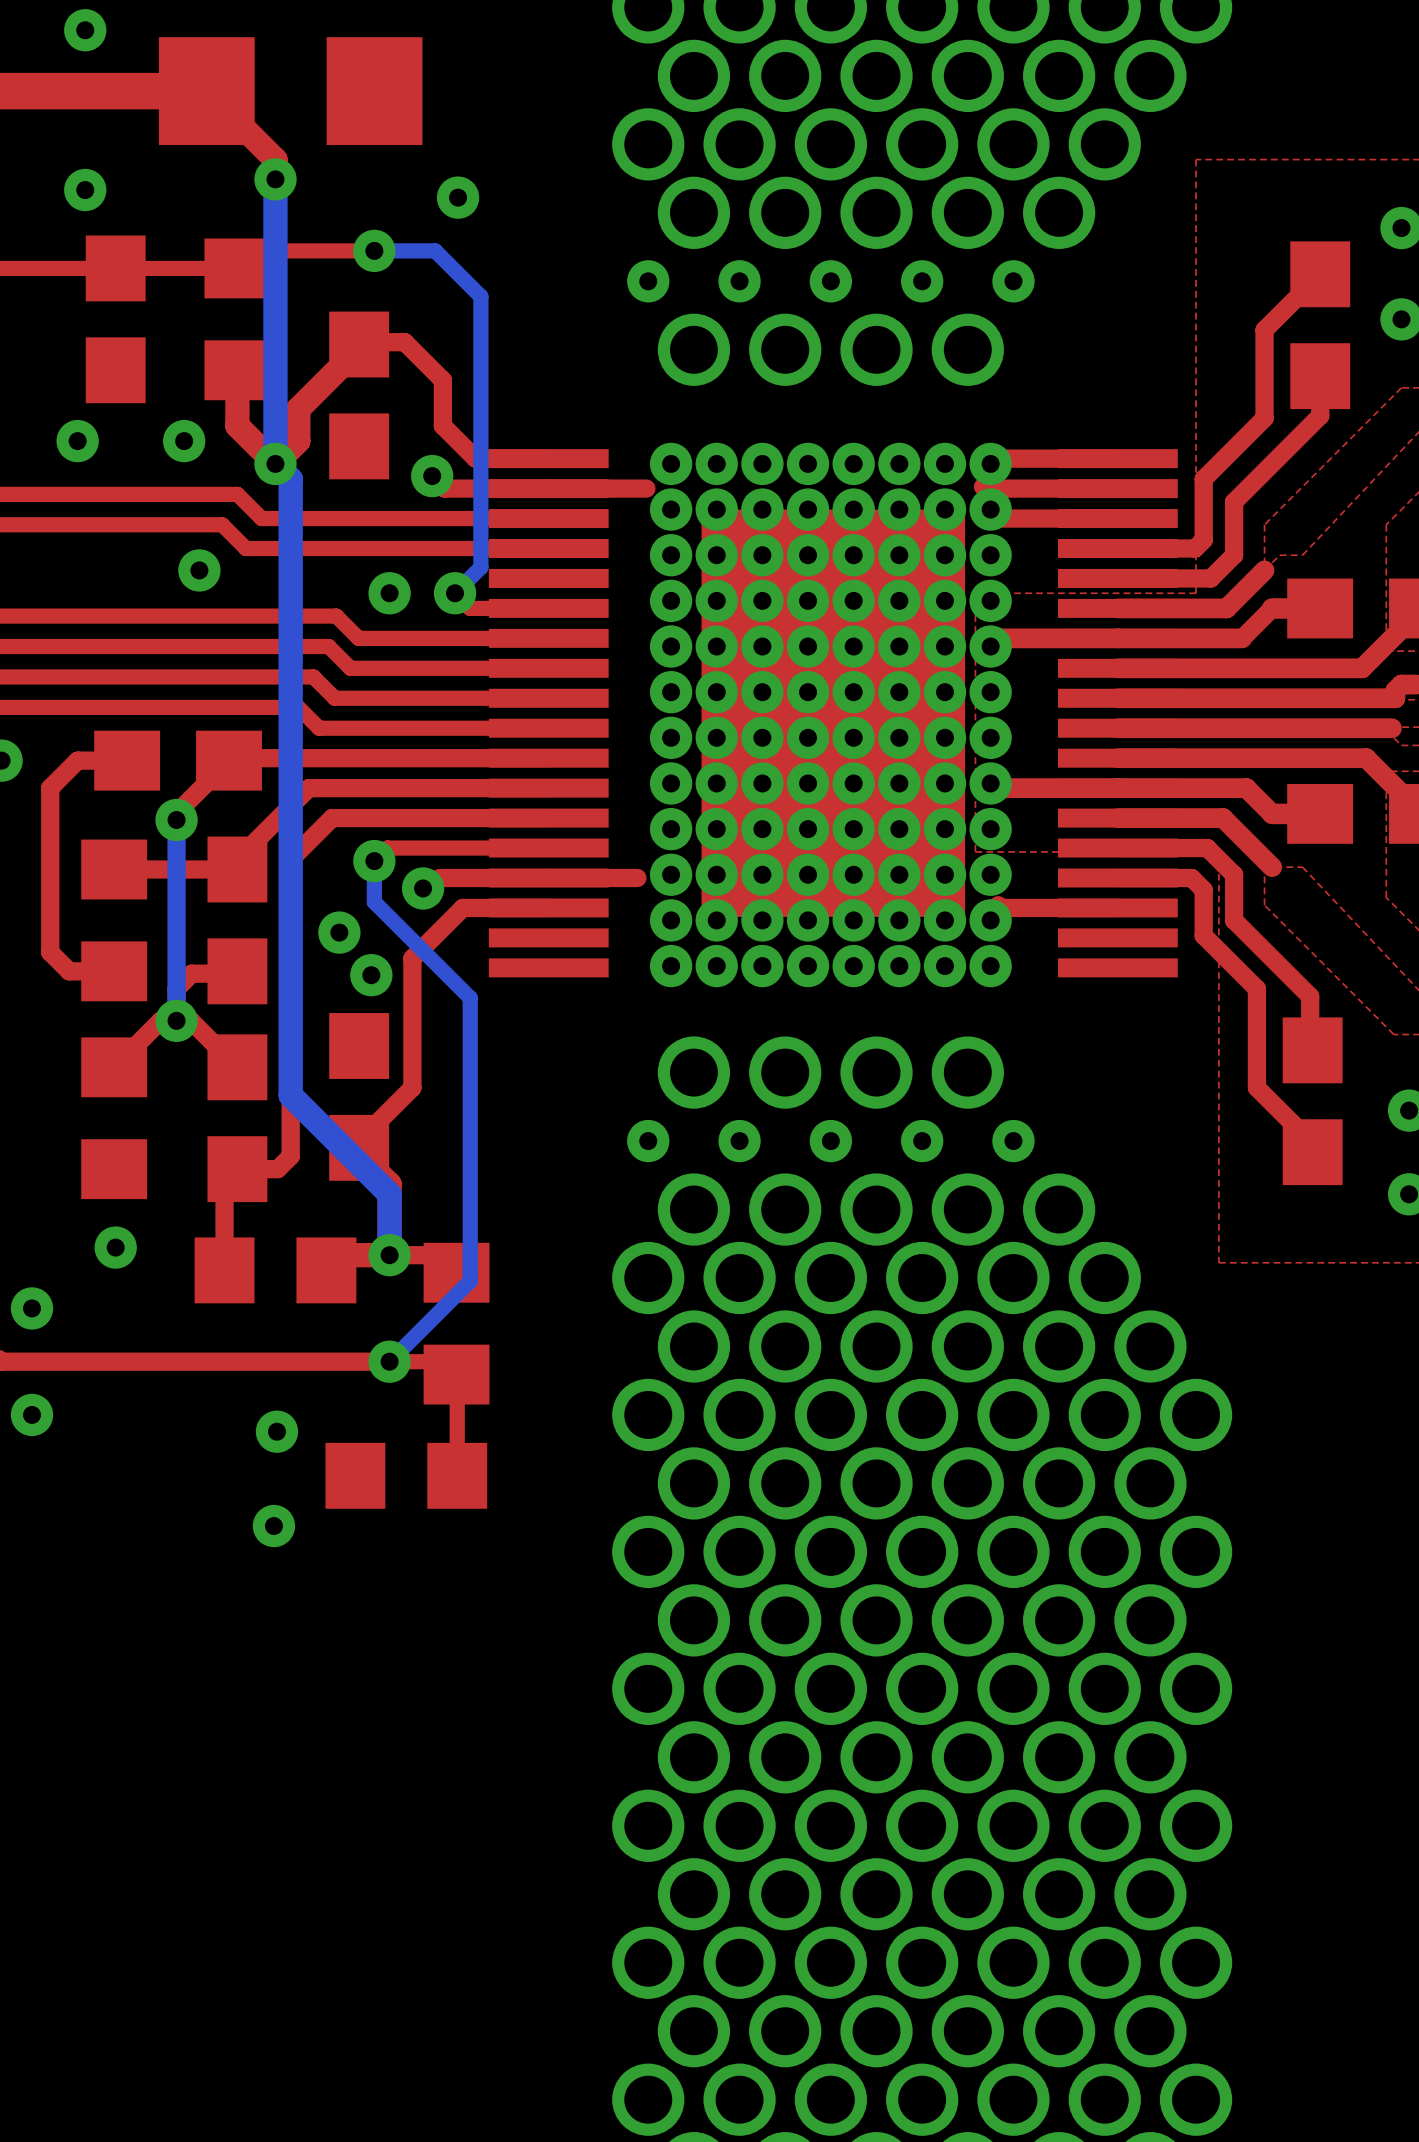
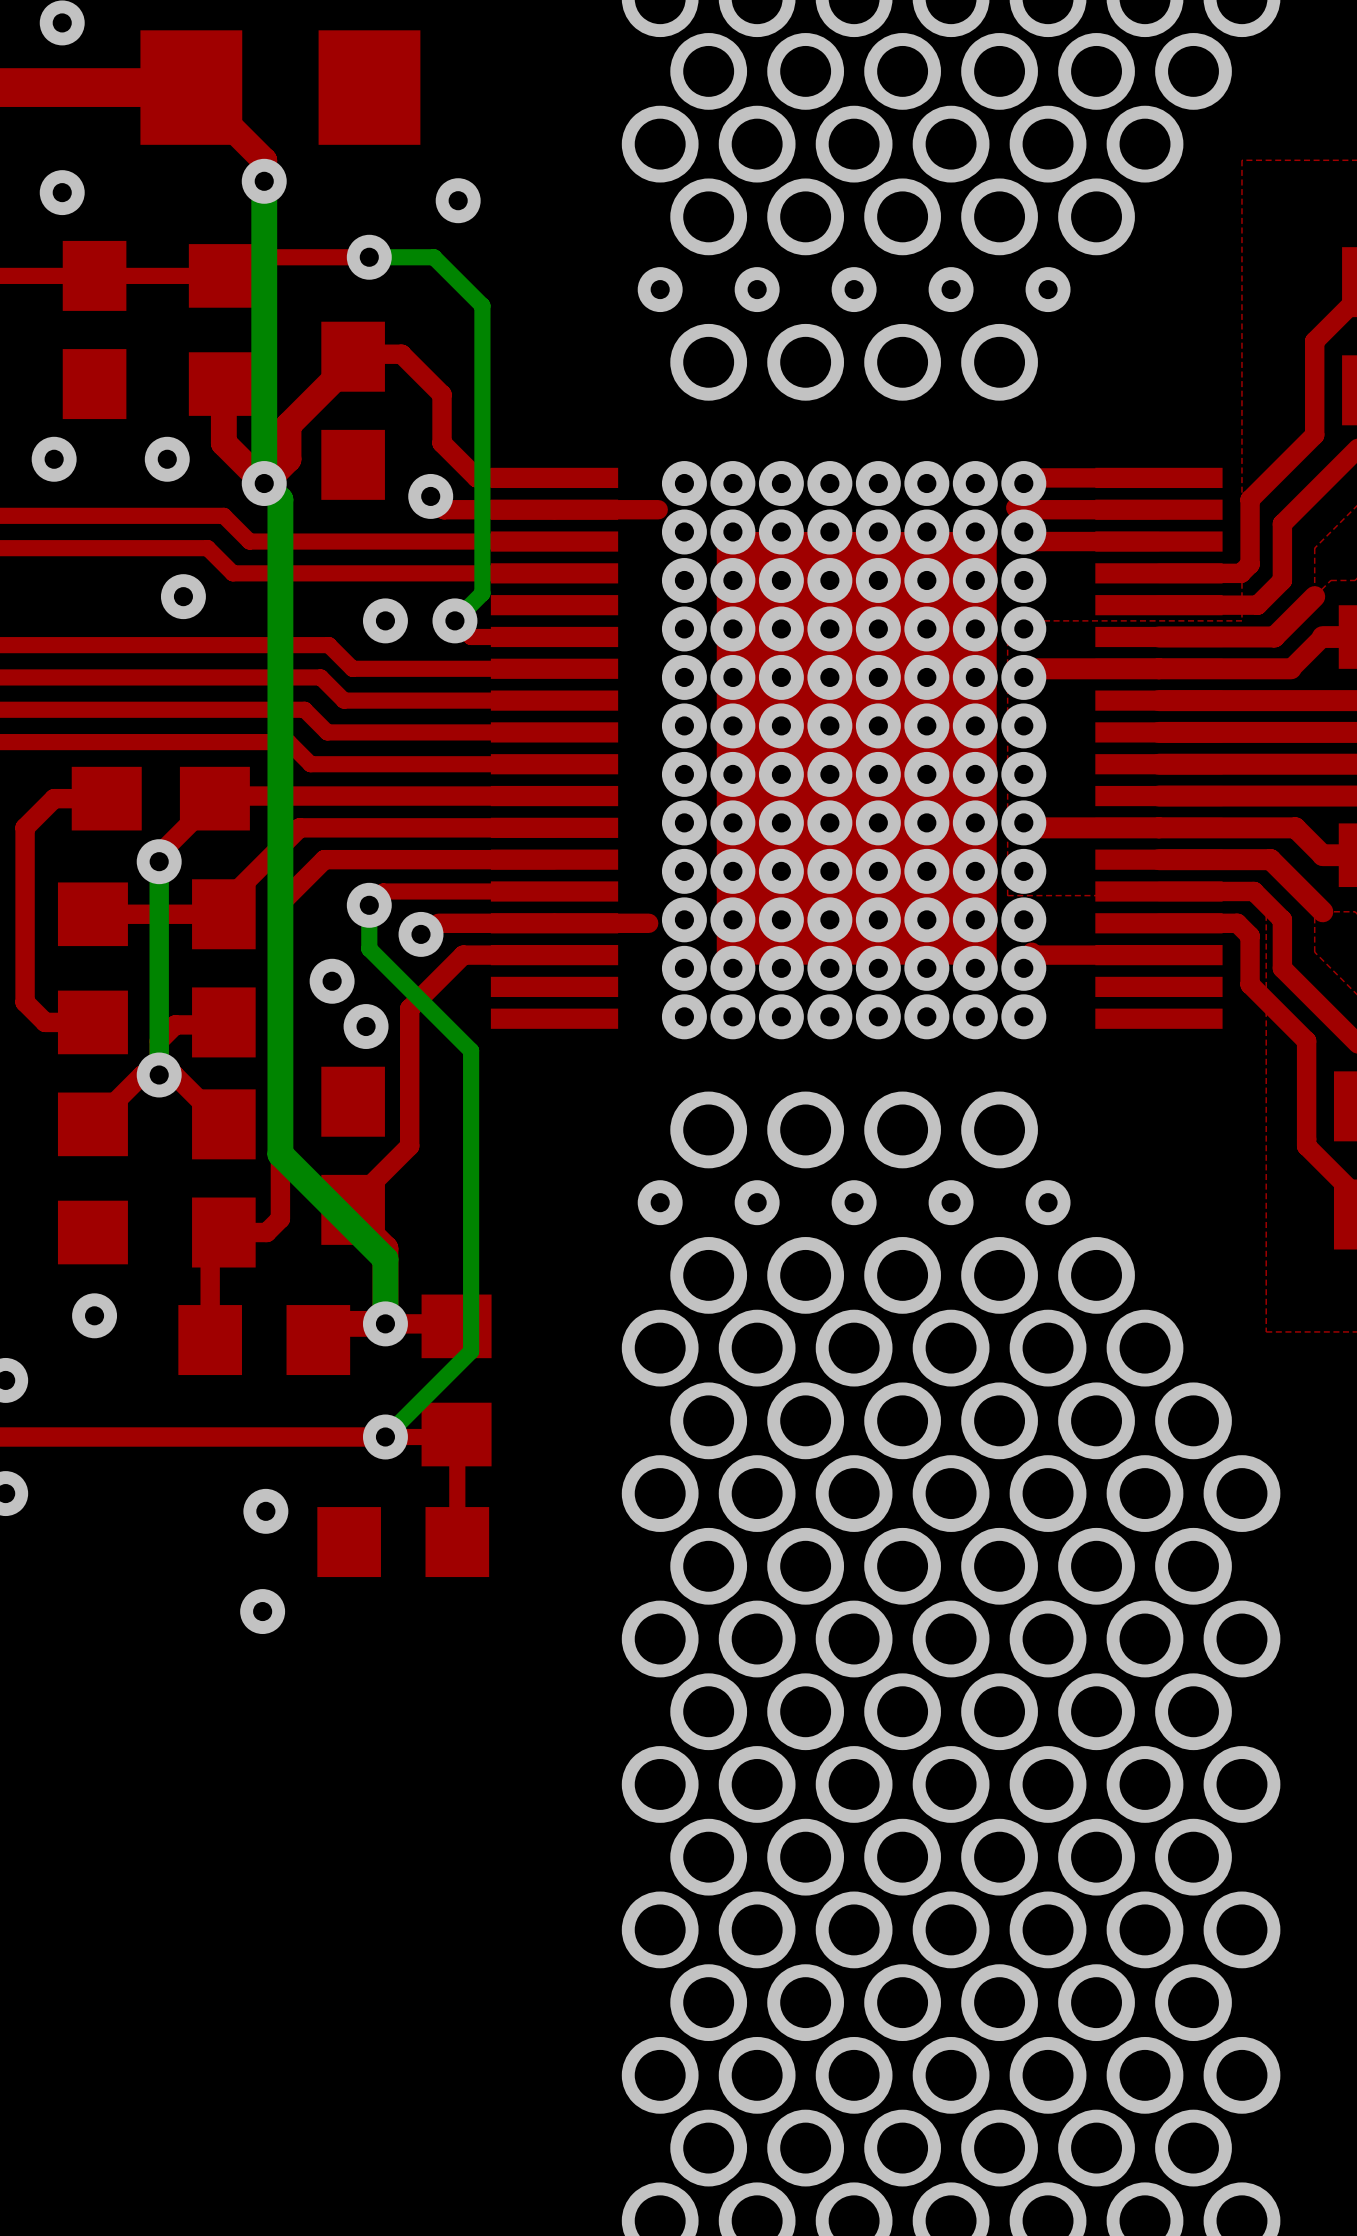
part position: (456, 1323) -> (456, 1380)
part position: (406, 1475) -> (403, 1542)

